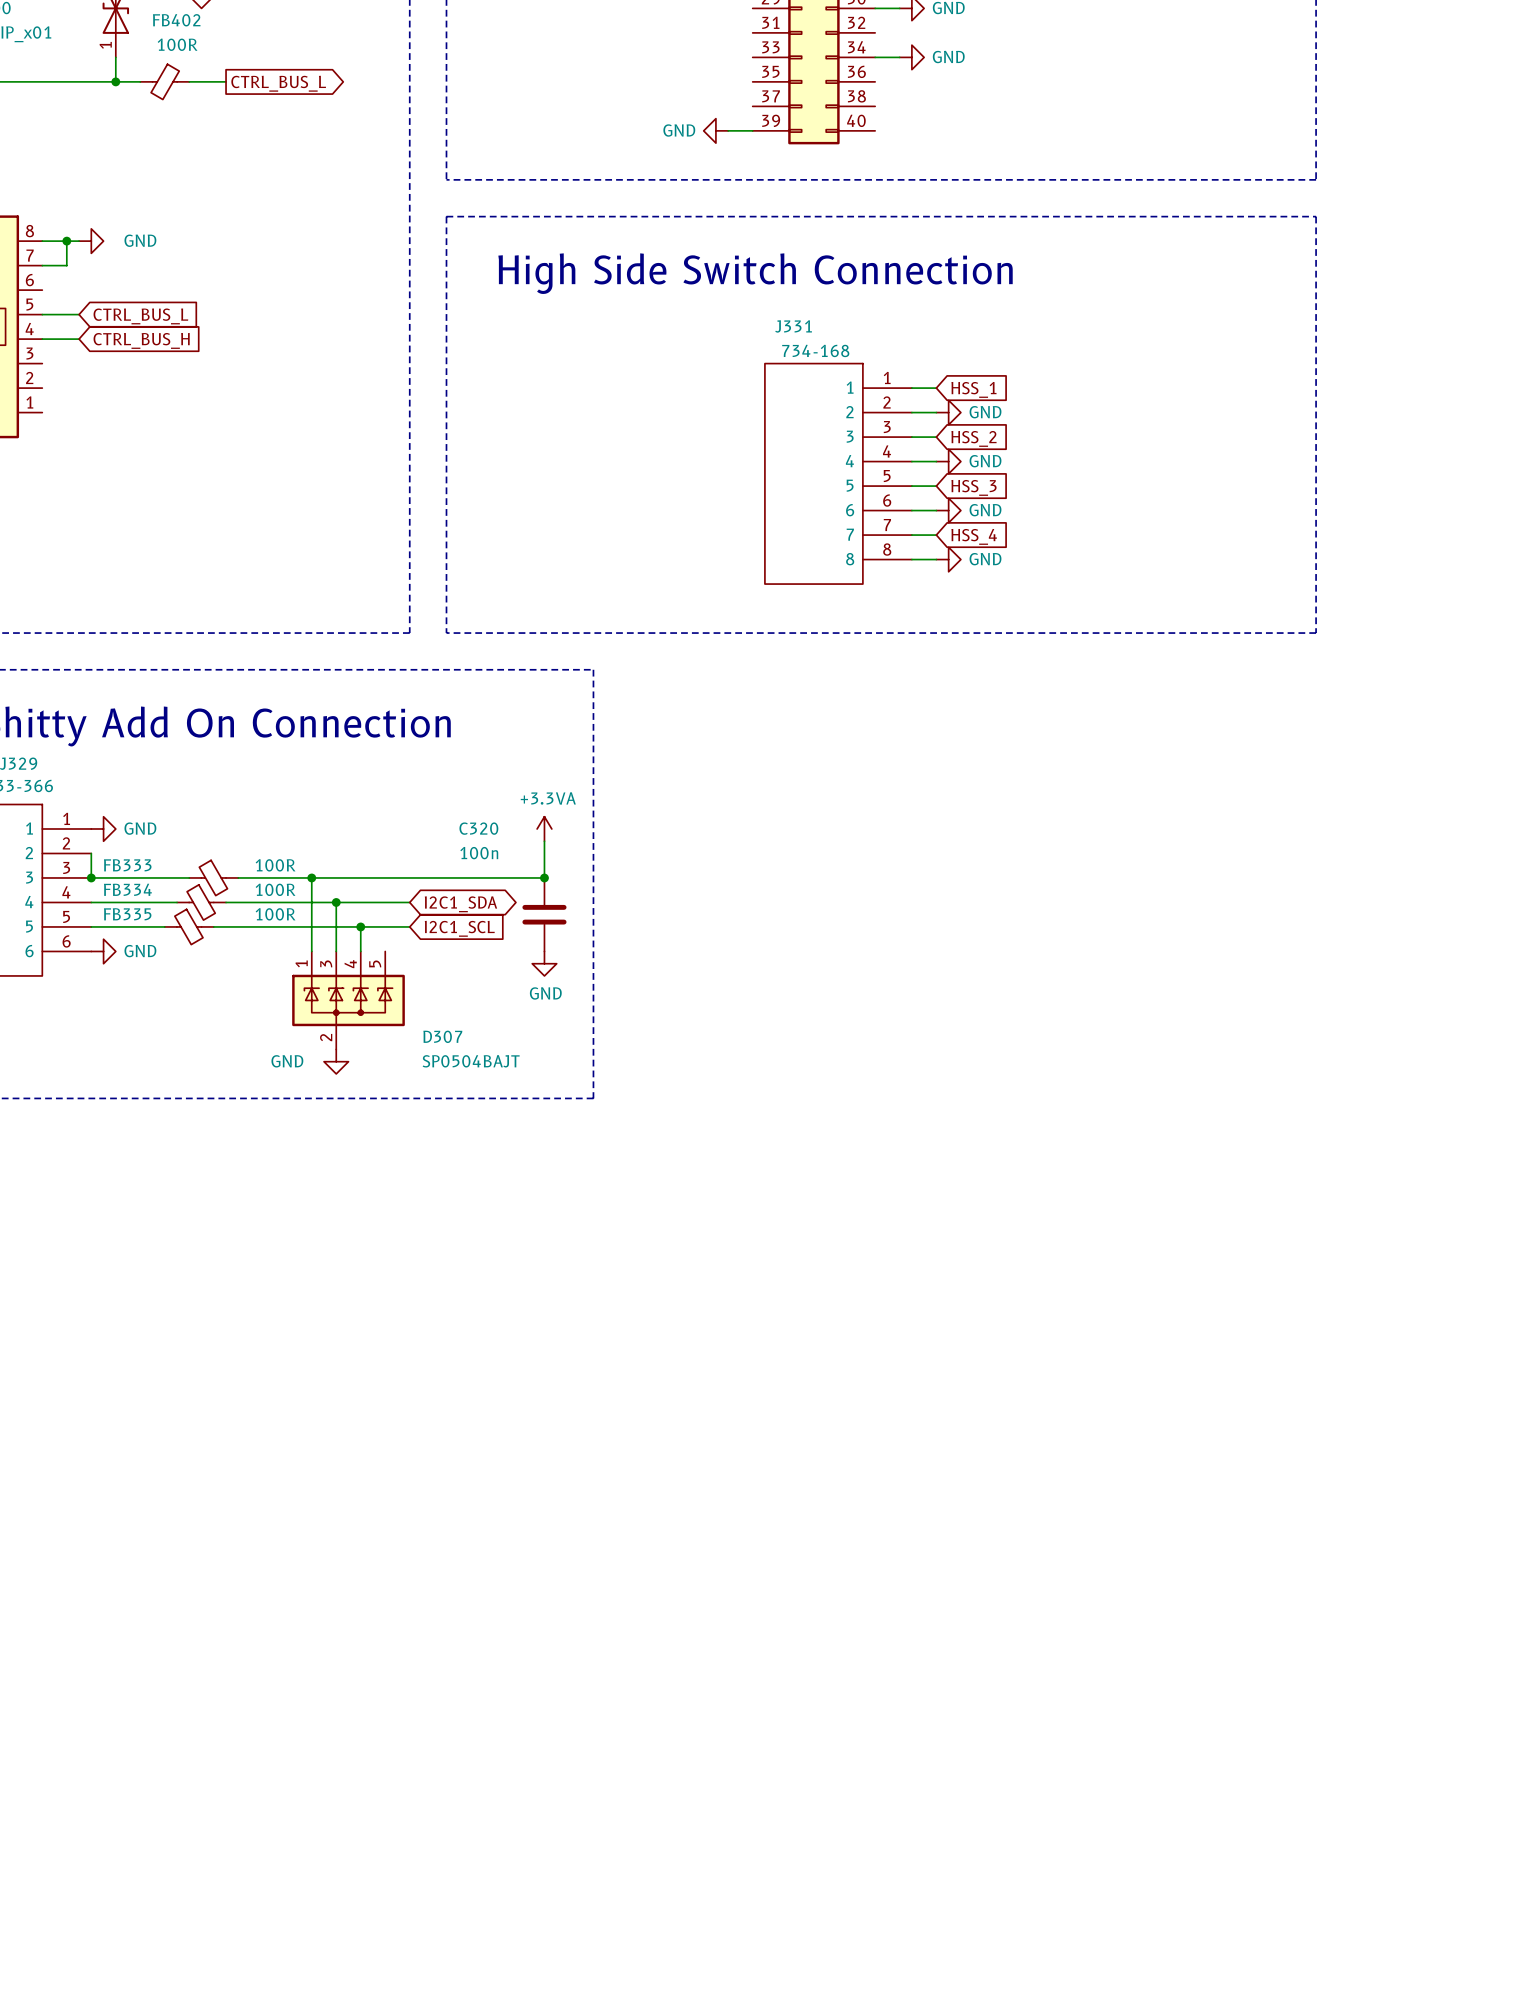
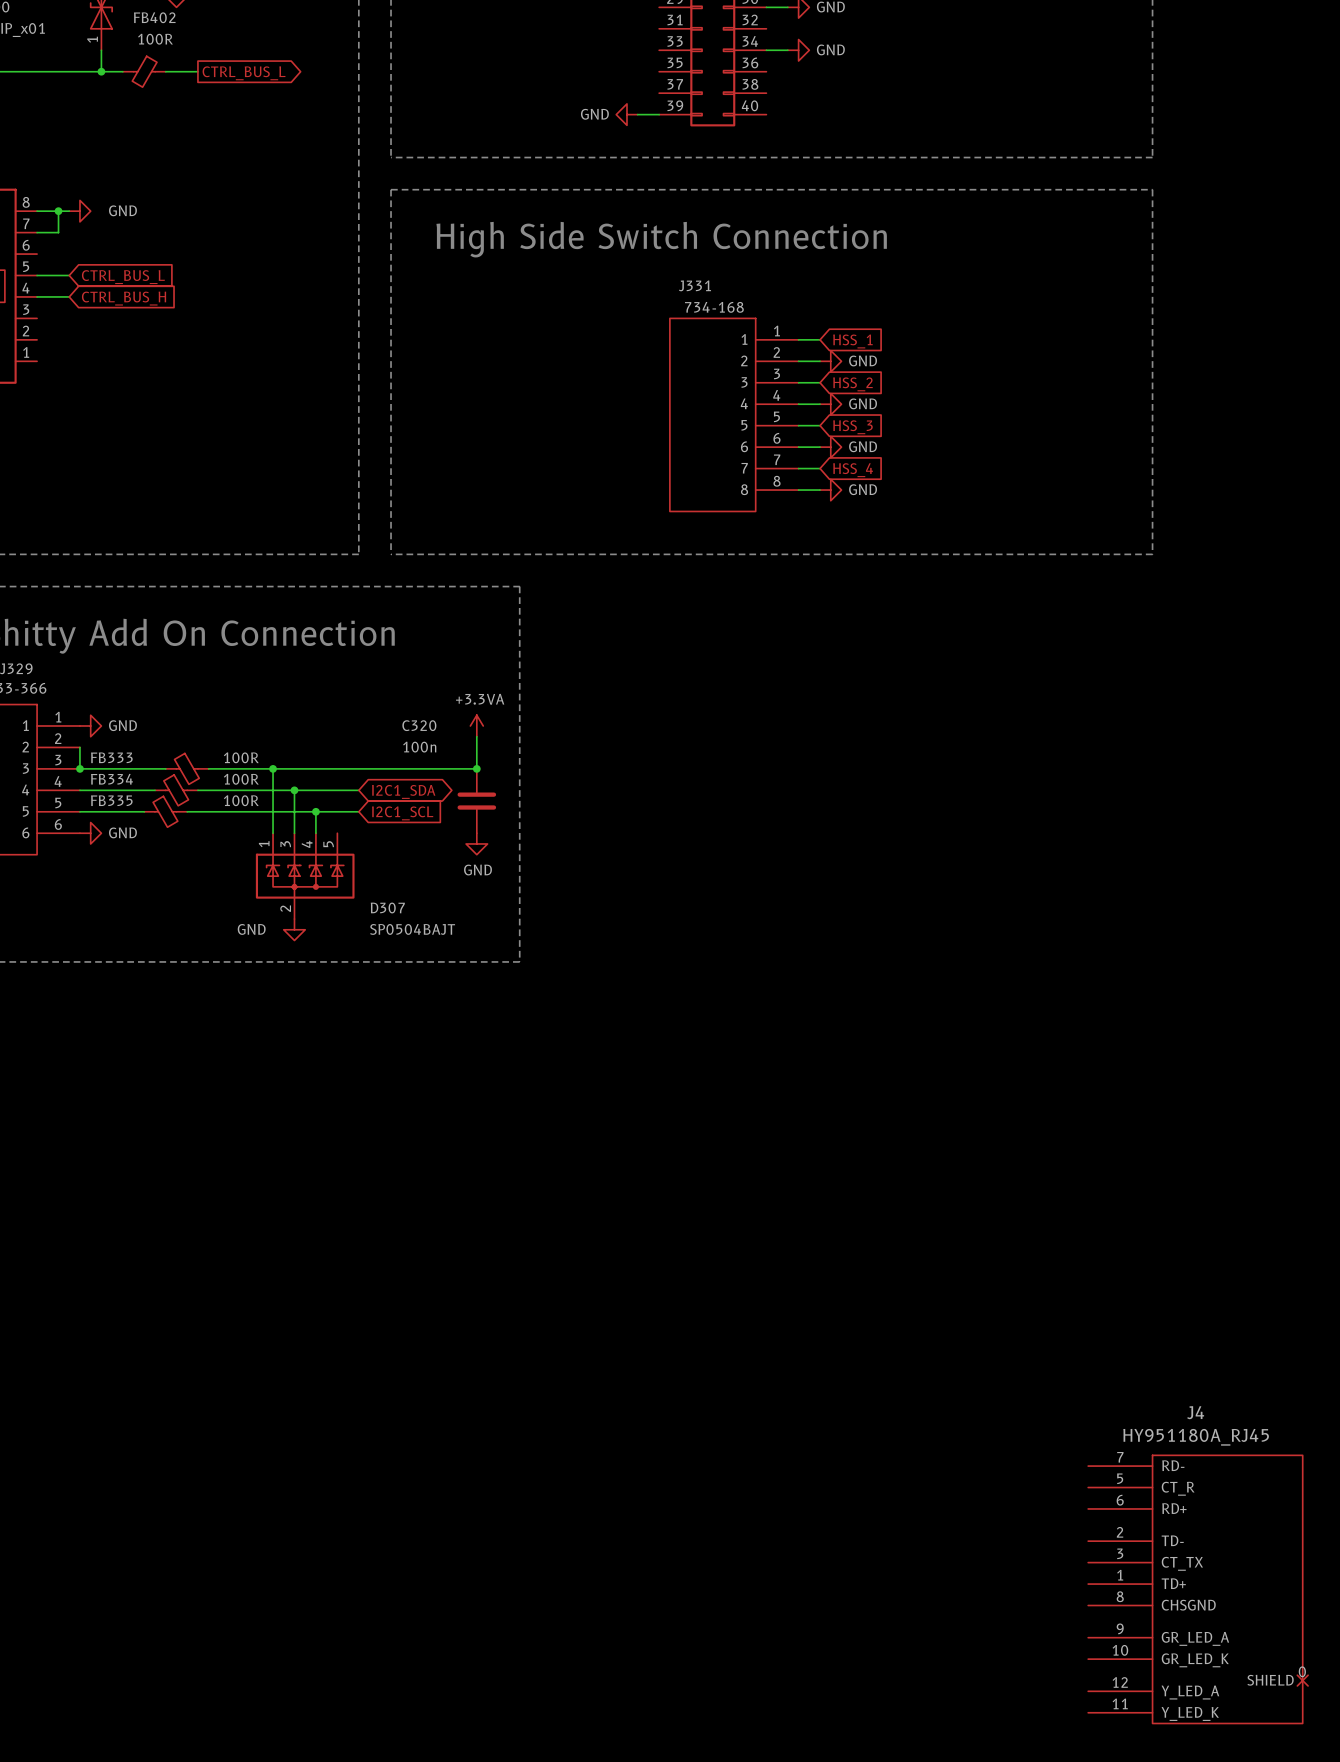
J4: none -> HY951180A_RJ45 (1198, 1589)

